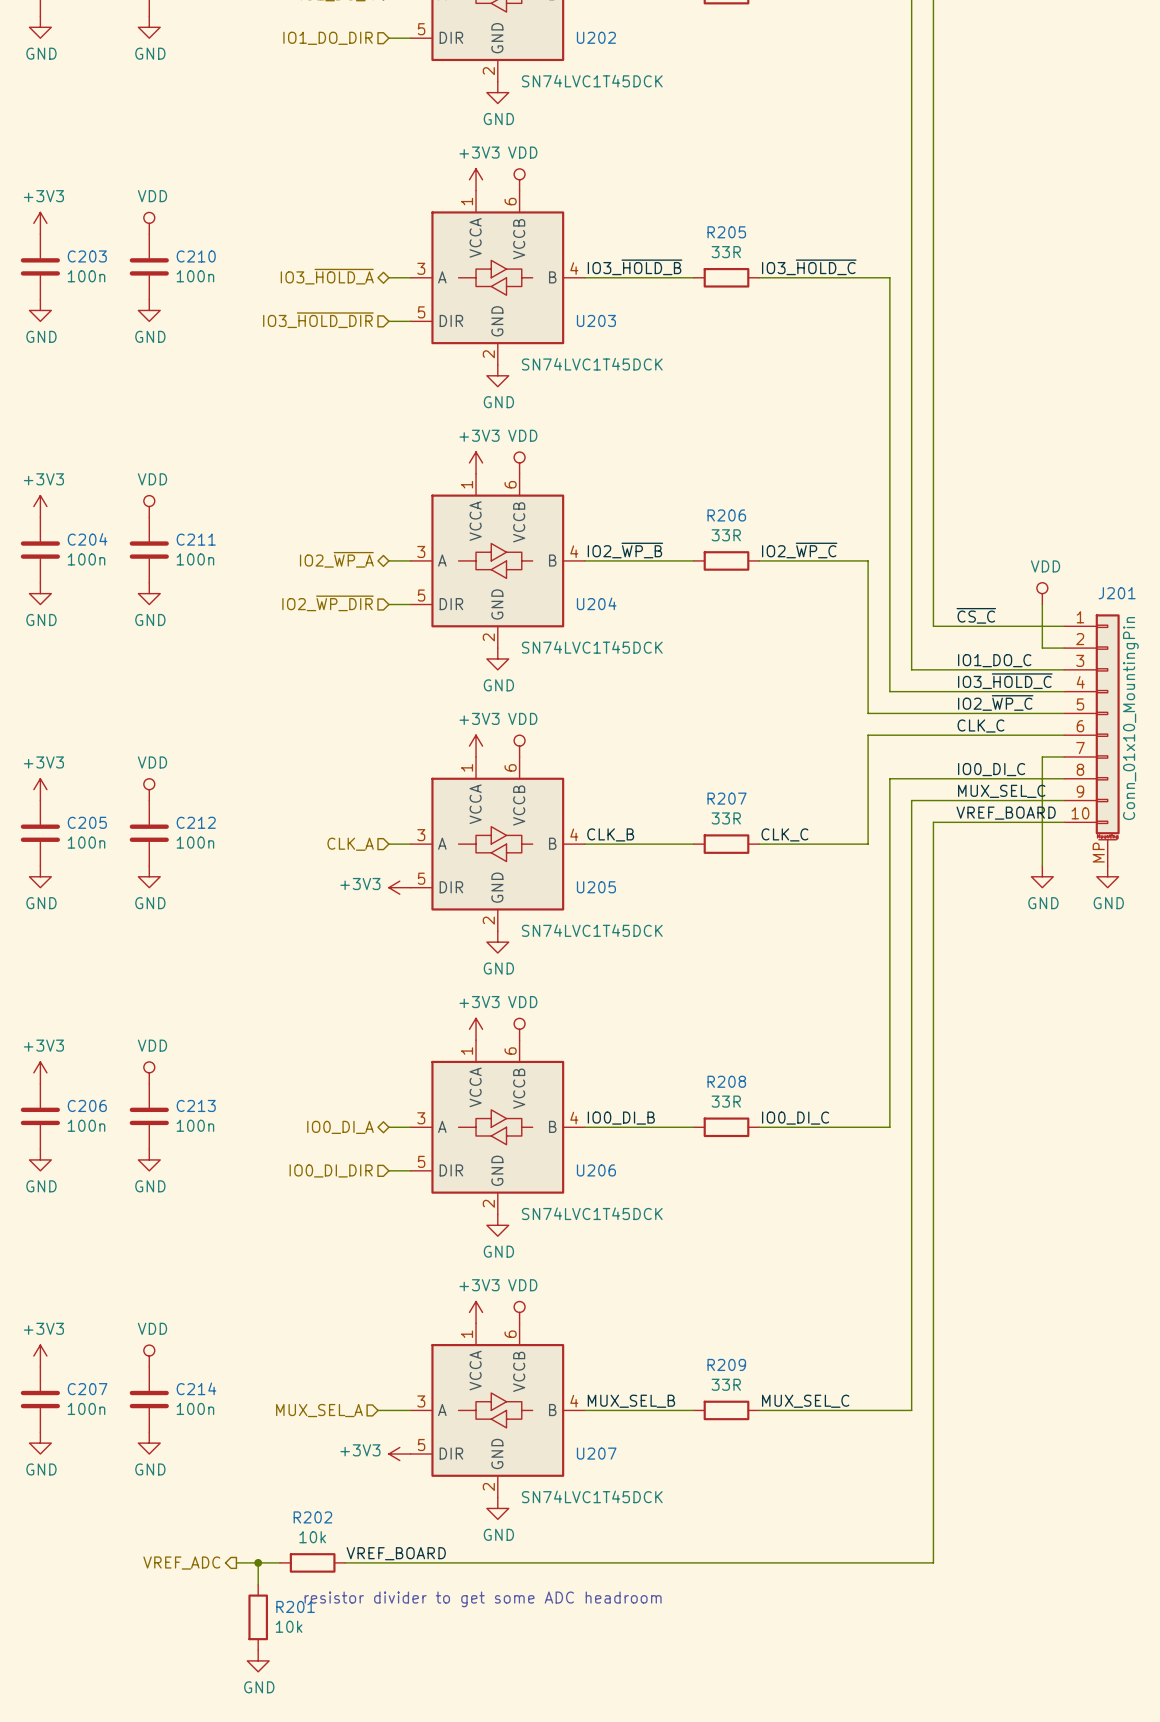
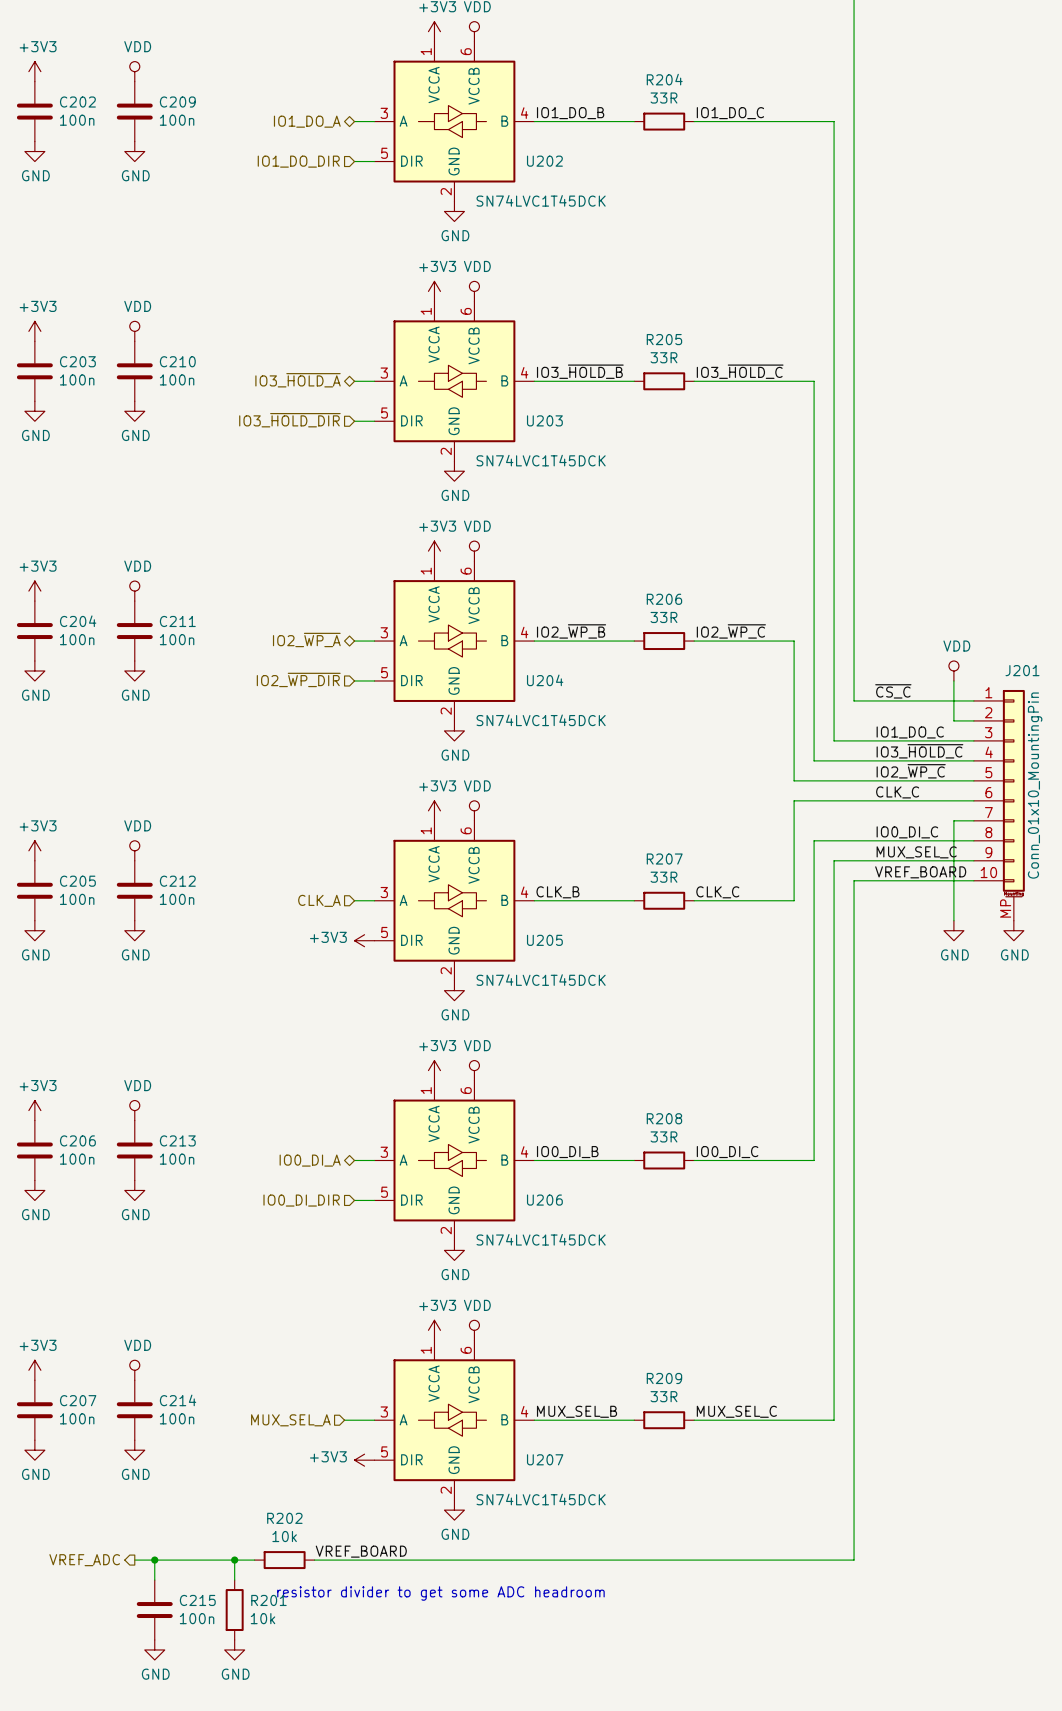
wire: none -> (134, 1560) (214, 1560)
wire: none -> (154, 1560) (154, 1580)
junction: none -> (154, 1560)
hierarchical label position: VREF_ADC (181, 1563) -> VREF_ADC (84, 1560)
C215: none -> 100n (154, 1610)
power symbol: none -> GND (154, 1649)

